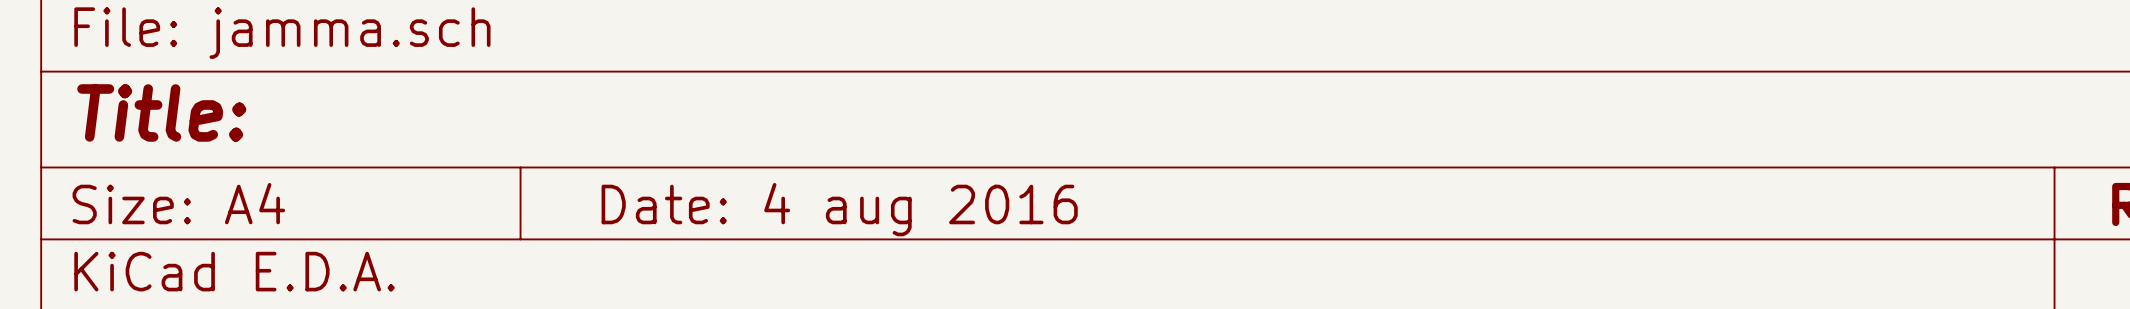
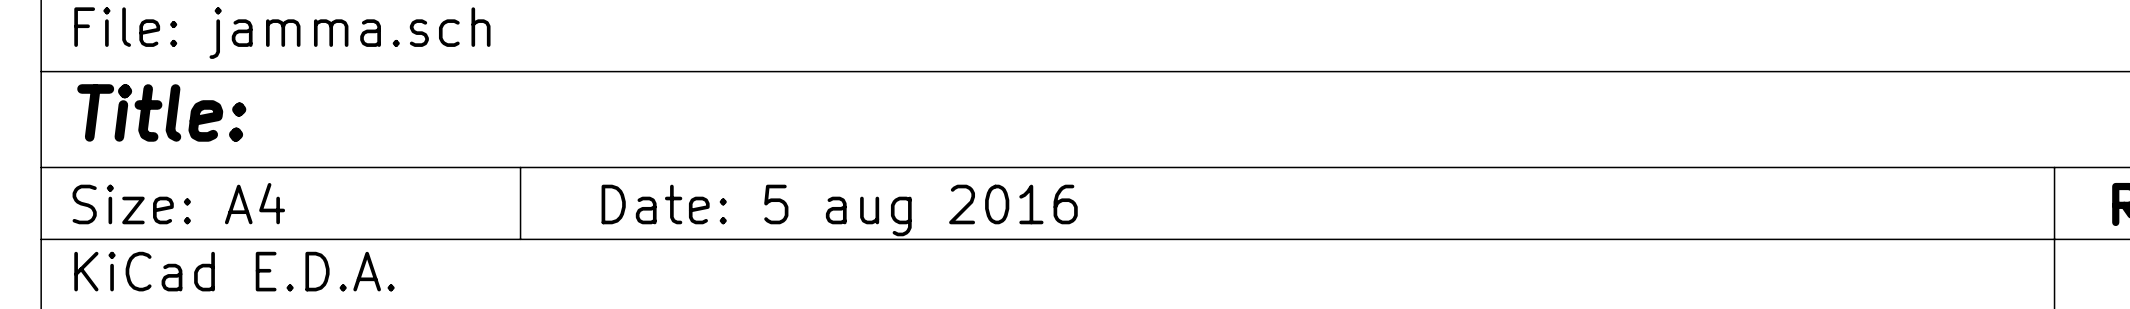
title block: Date: 4 aug 2016 (839, 209) -> Date: 5 aug 2016 (839, 210)

